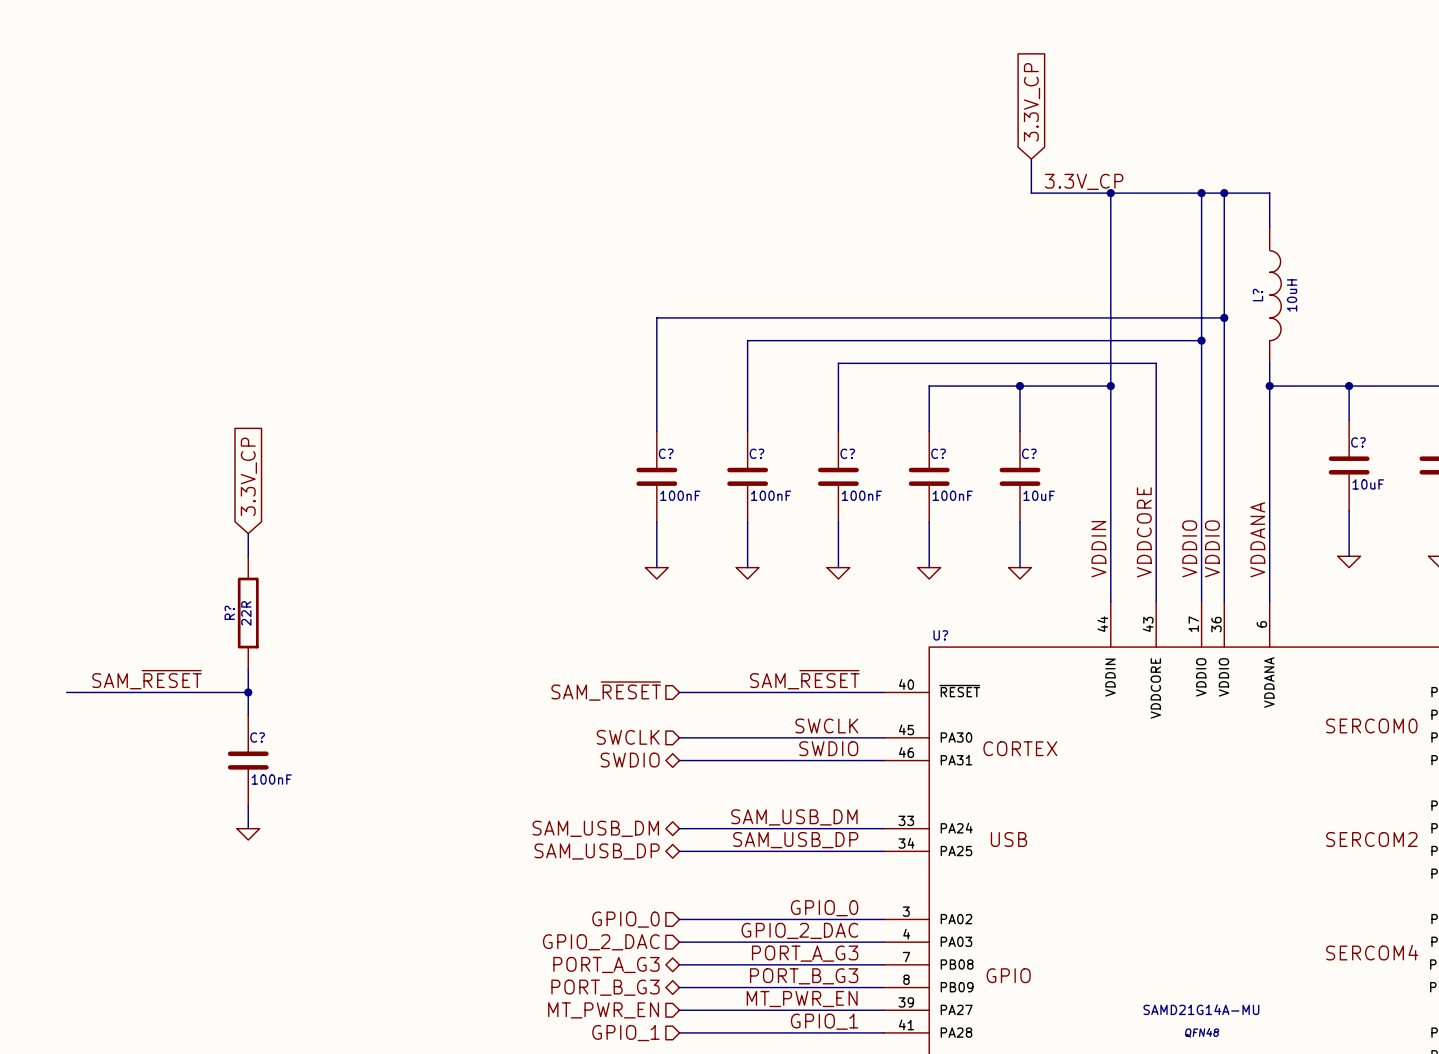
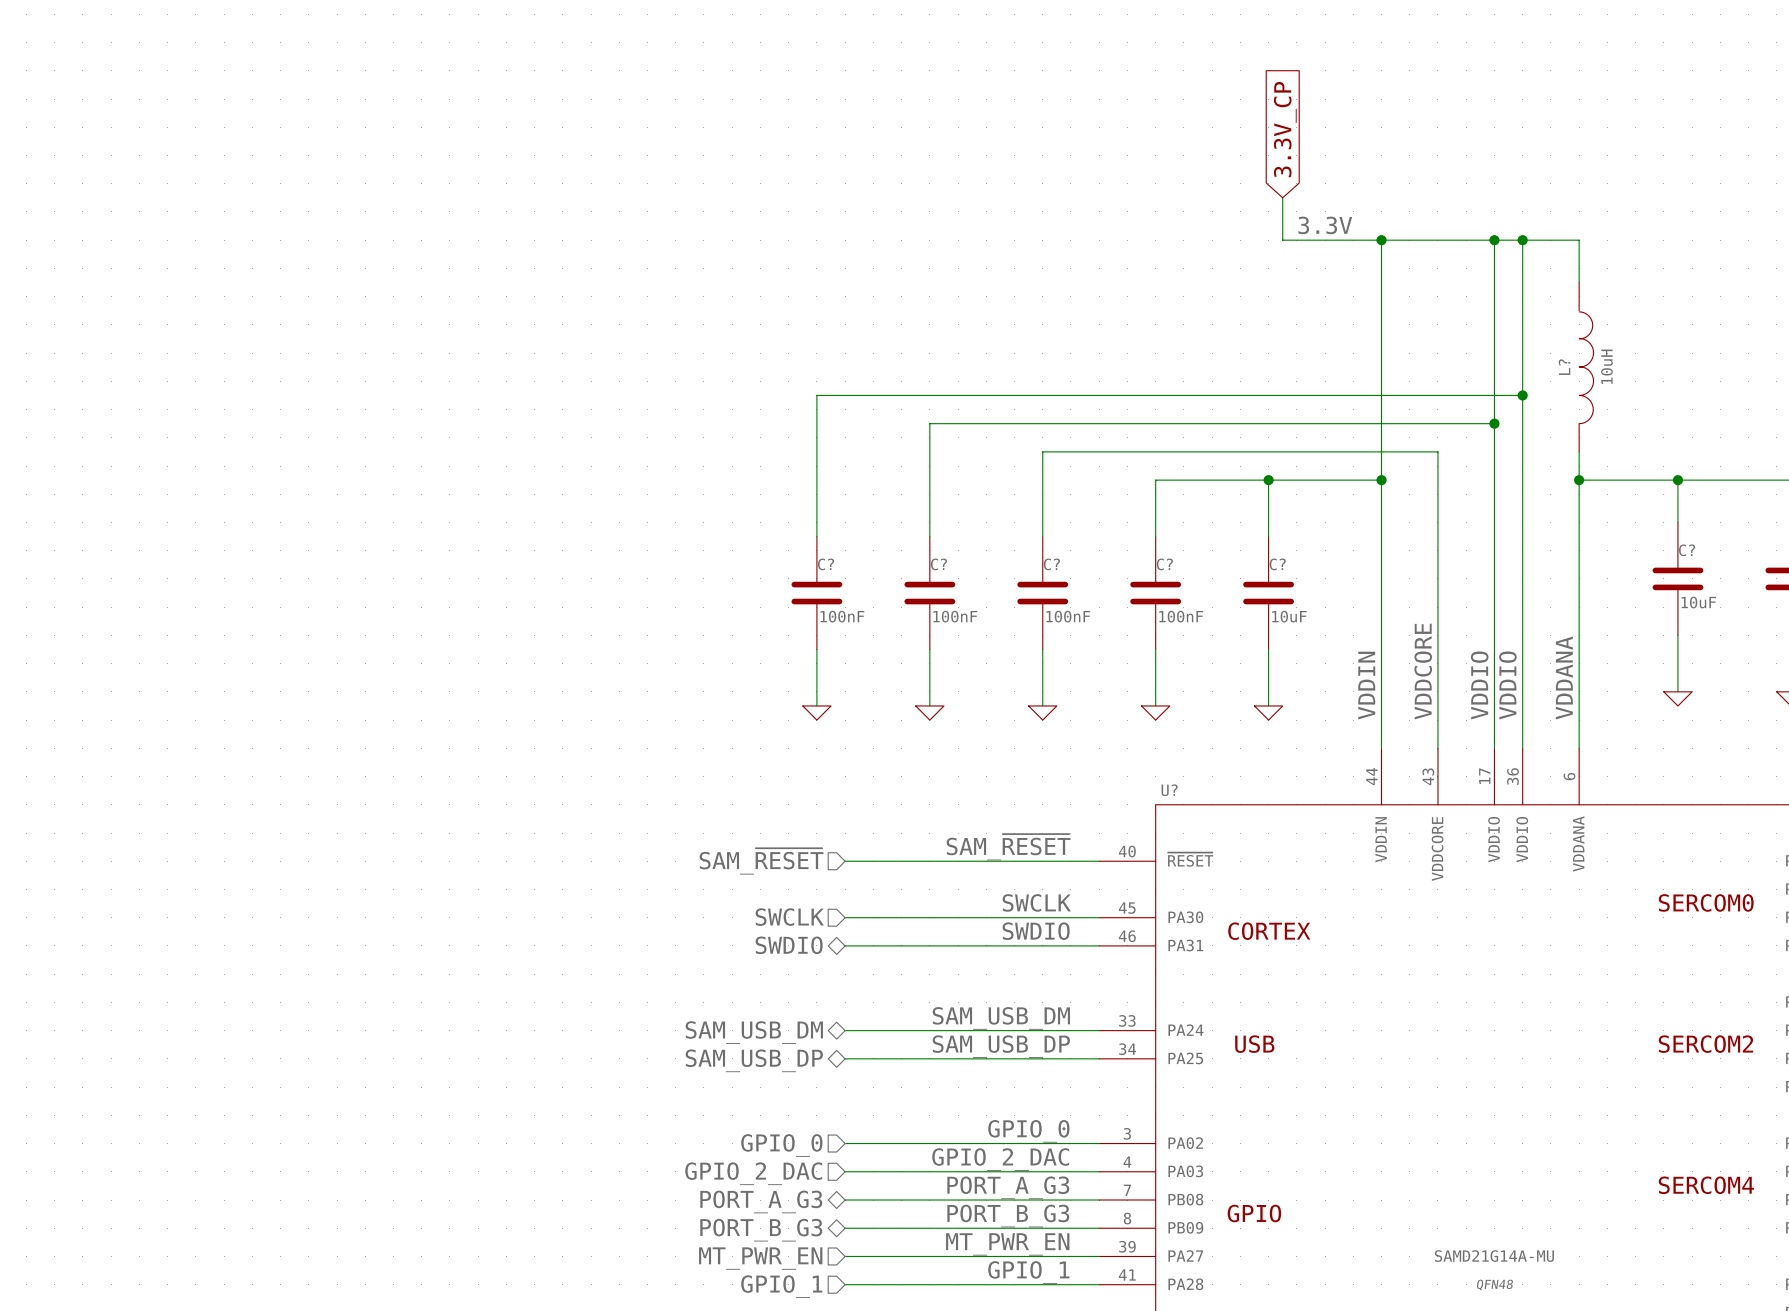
label: 3.3V_CP (1084, 181) -> 3.3V (1325, 225)
global label: 3.3V_CP (248, 476) -> none
wire: (248, 533) (248, 556) -> none
R?: 22R (248, 613) -> none
wire: (248, 669) (248, 715) -> none
label: SAM_~{RESET} (147, 679) -> none
wire: (66, 692) (248, 692) -> none
junction: (248, 692) -> none
C?: 100nF (248, 760) -> none
wire: (248, 805) (248, 828) -> none
power symbol: (248, 834) -> none

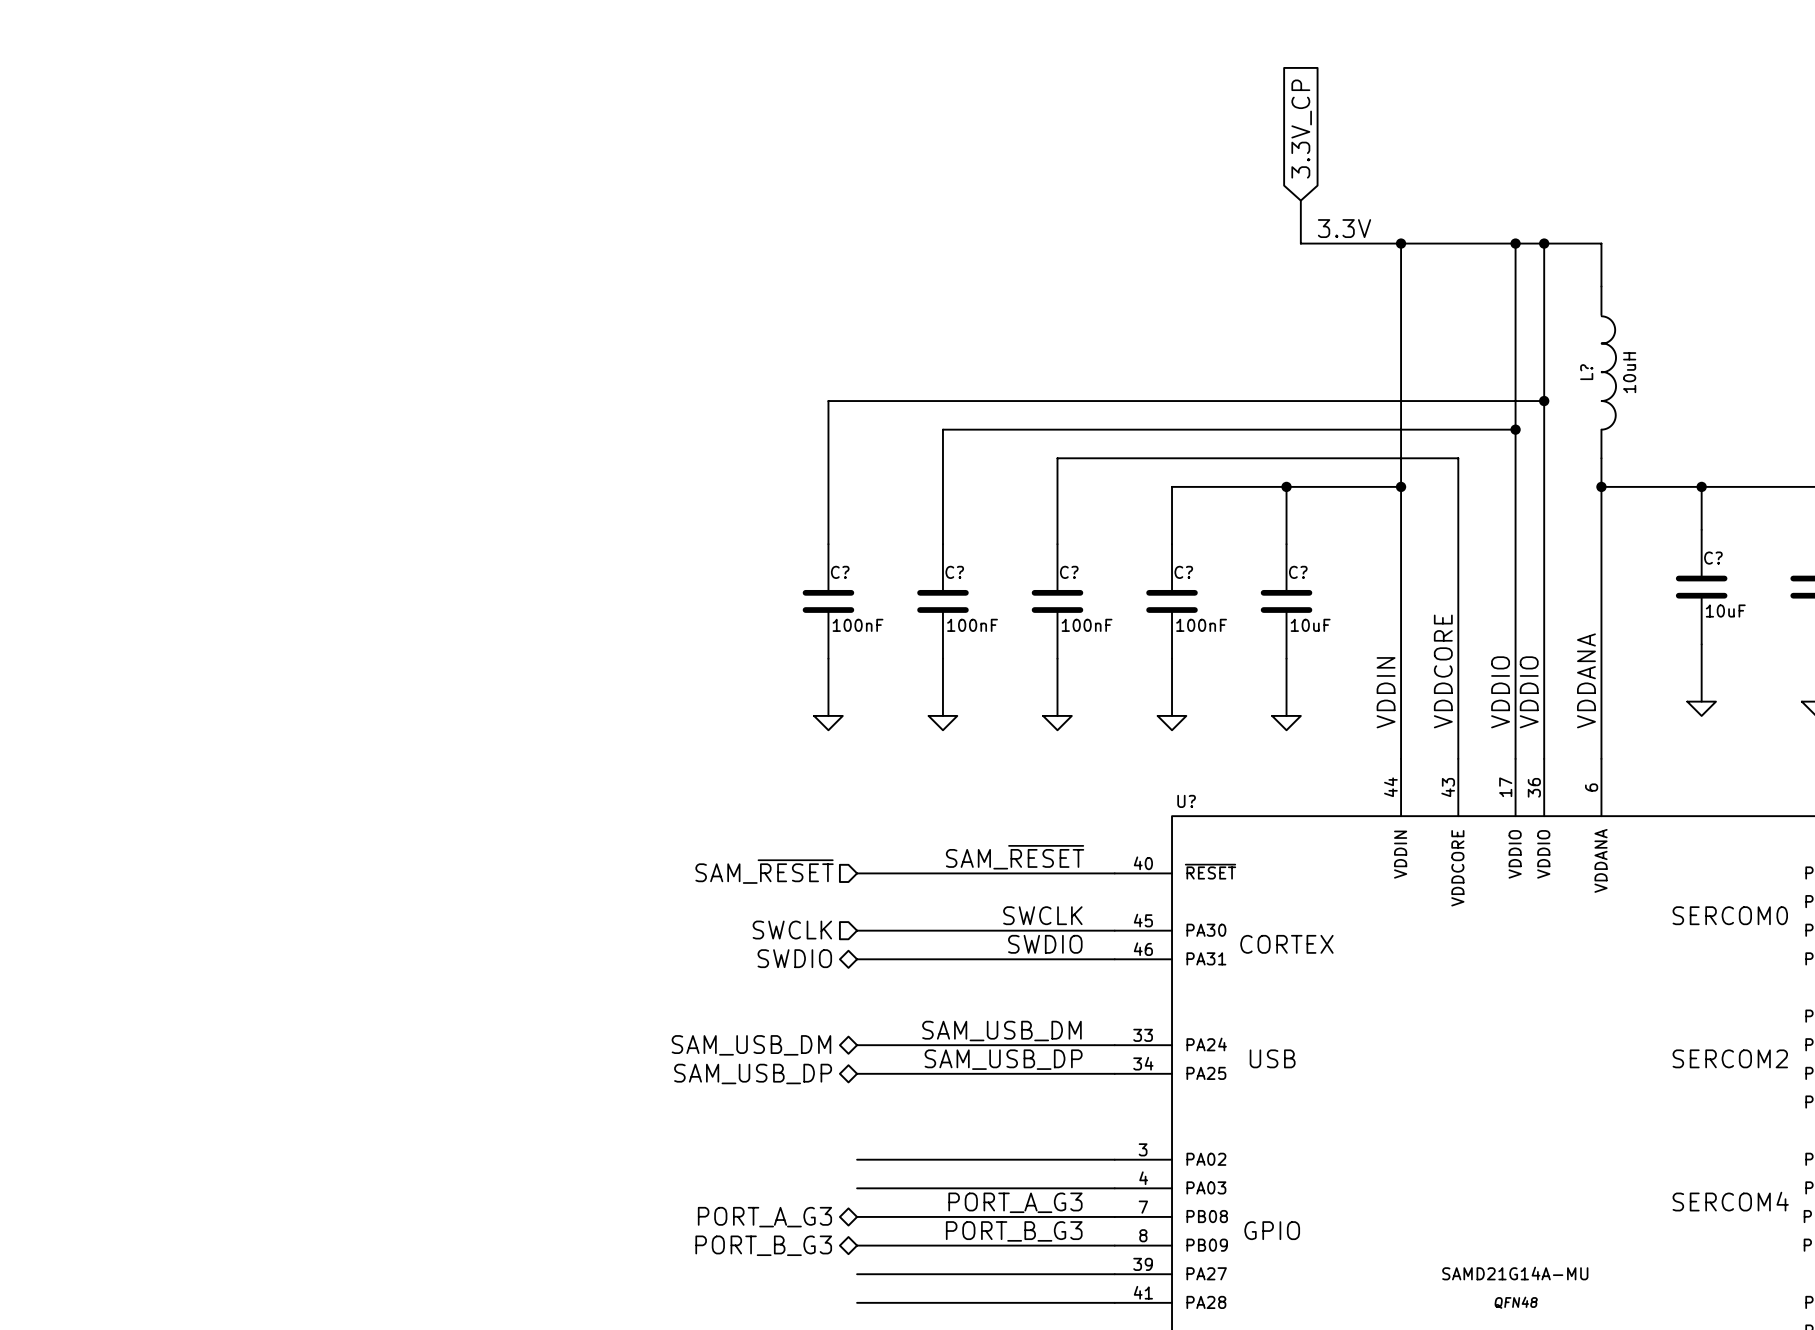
label: GPIO_0 (1028, 1131) -> none
hierarchical label: GPIO_0 (781, 1145) -> none
label: GPIO_2_DAC (1000, 1159) -> none
hierarchical label: GPIO_2_DAC (753, 1173) -> none
label: MT_PWR_EN (1007, 1244) -> none
hierarchical label: MT_PWR_EN (760, 1258) -> none
label: GPIO_1 (1028, 1272) -> none
hierarchical label: GPIO_1 (781, 1286) -> none

